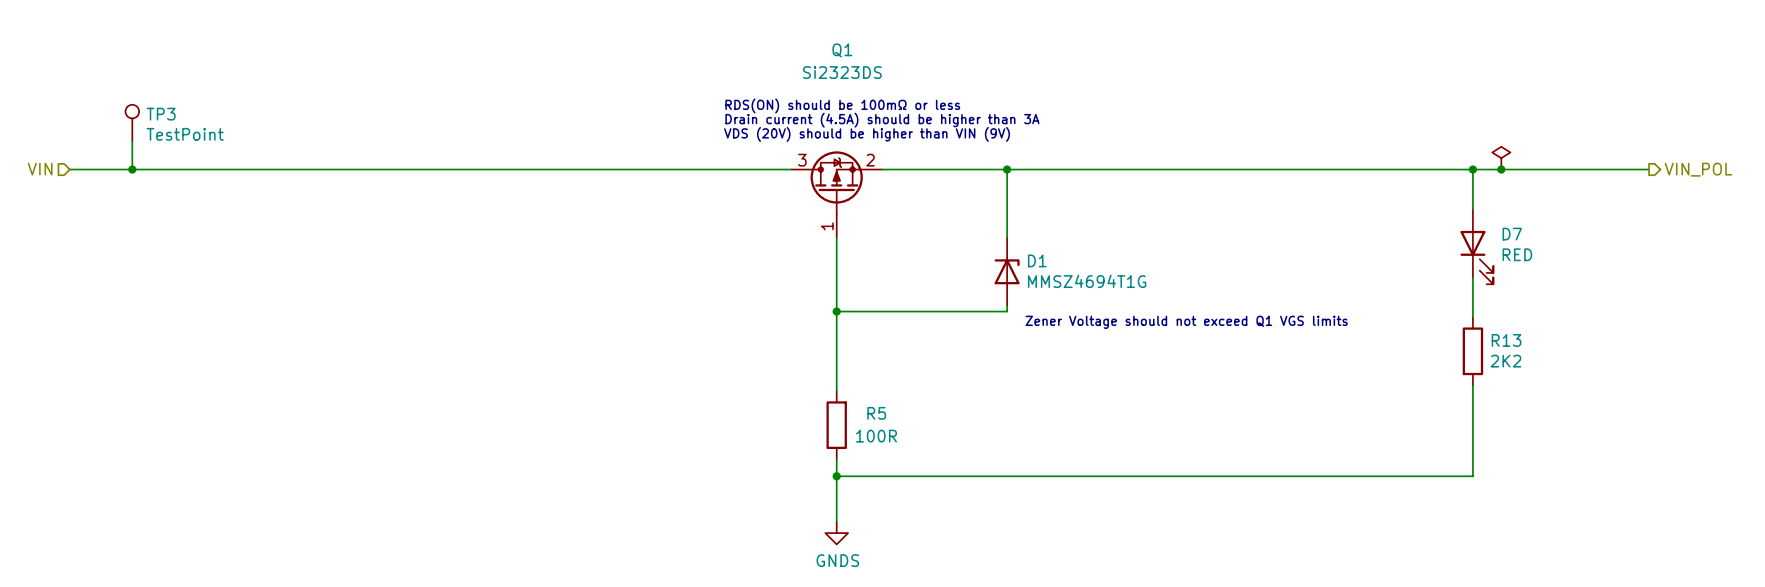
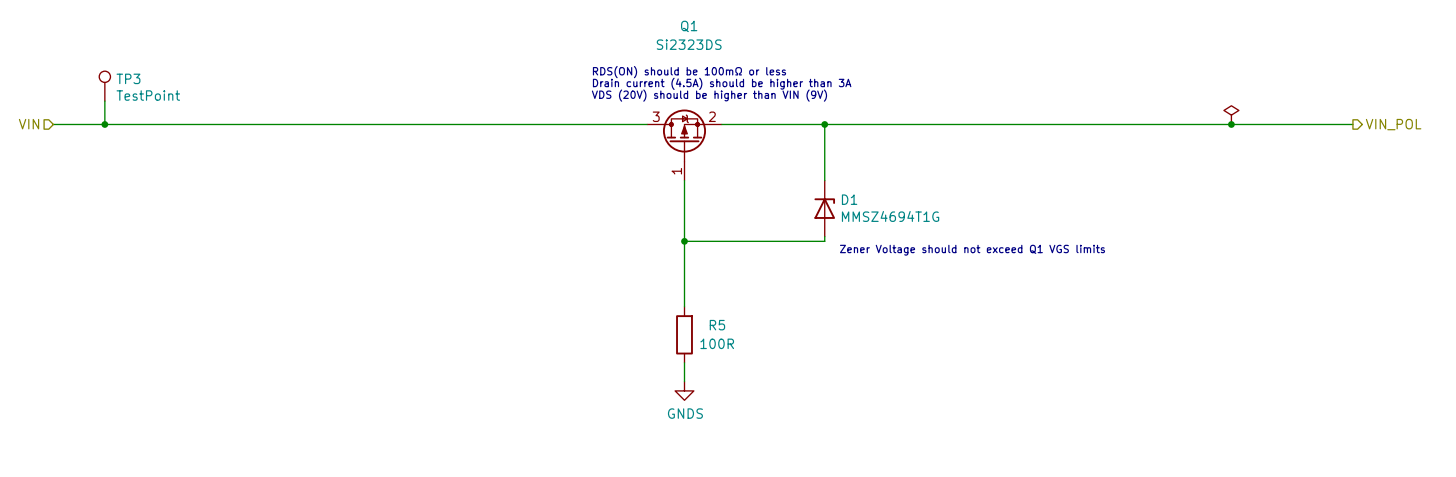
wire: (1472, 169) (1472, 209) -> none
junction: (1472, 169) -> none
D7: RED (1476, 246) -> none
wire: (1472, 277) (1472, 317) -> none
R13: 2K2 (1472, 351) -> none
wire: (1472, 385) (1472, 476) (836, 476) -> none
junction: (836, 476) -> none
wire: (836, 481) (836, 521) -> none
power symbol position: GNDS (836, 533) -> GNDS (684, 390)

